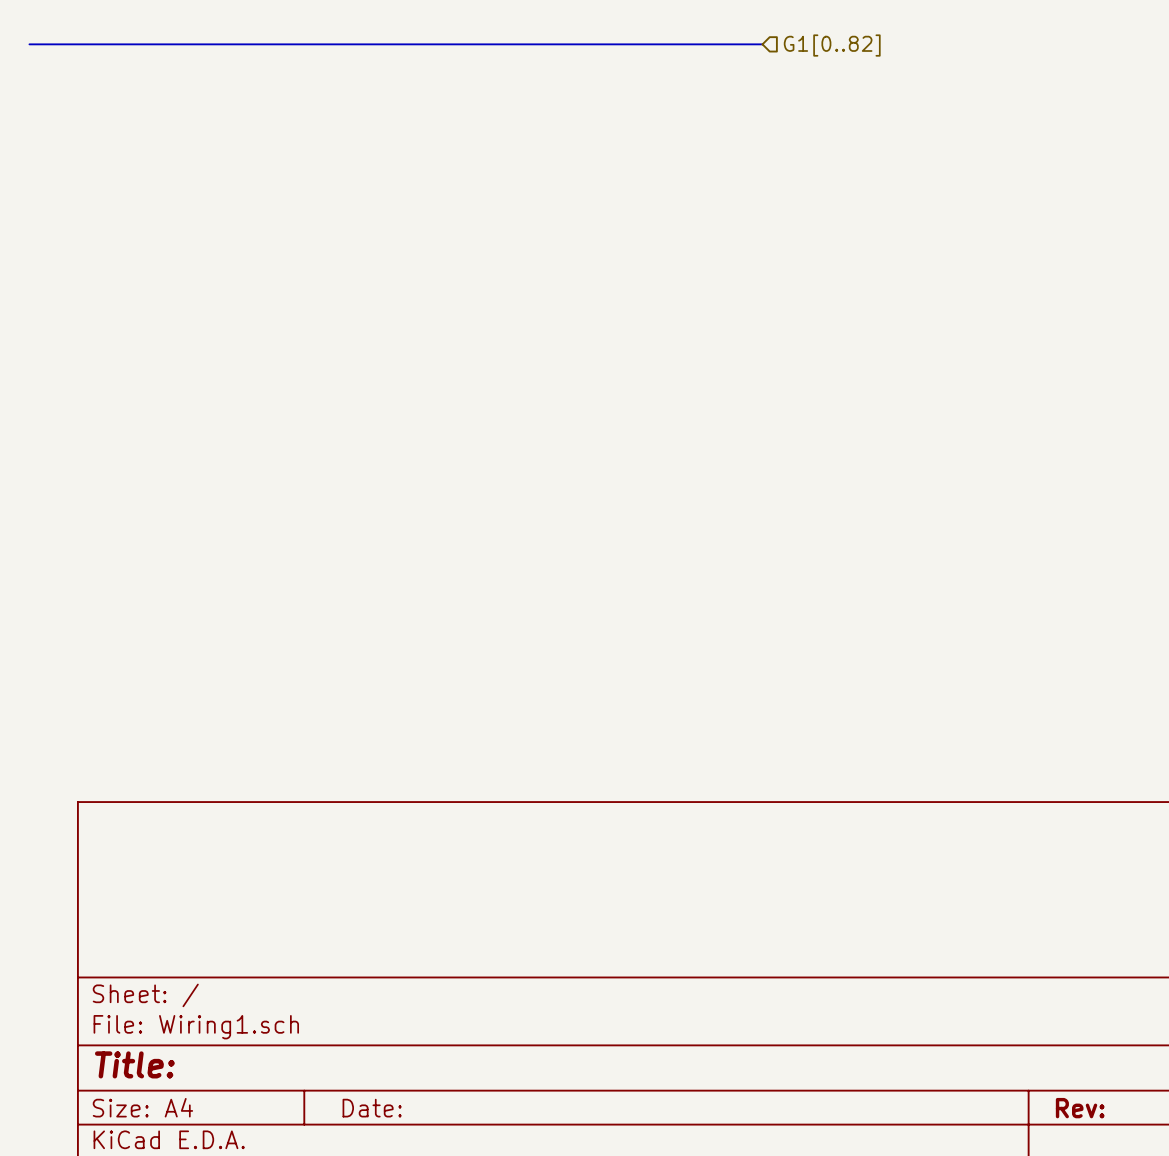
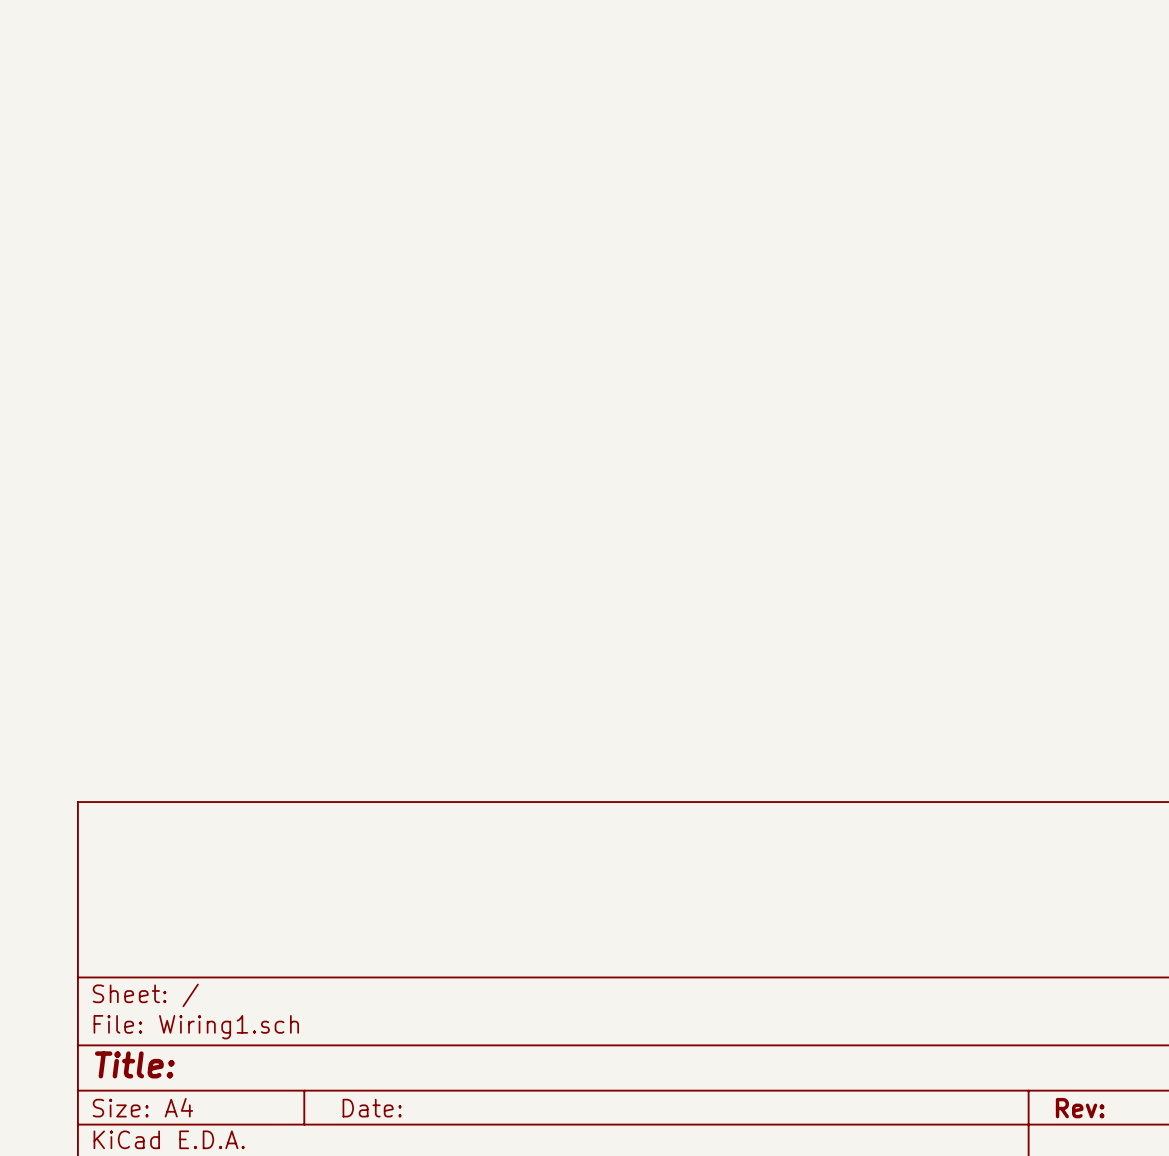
bus: (29, 44) (762, 44) -> none
hierarchical label: G1[0..82] (832, 45) -> none

